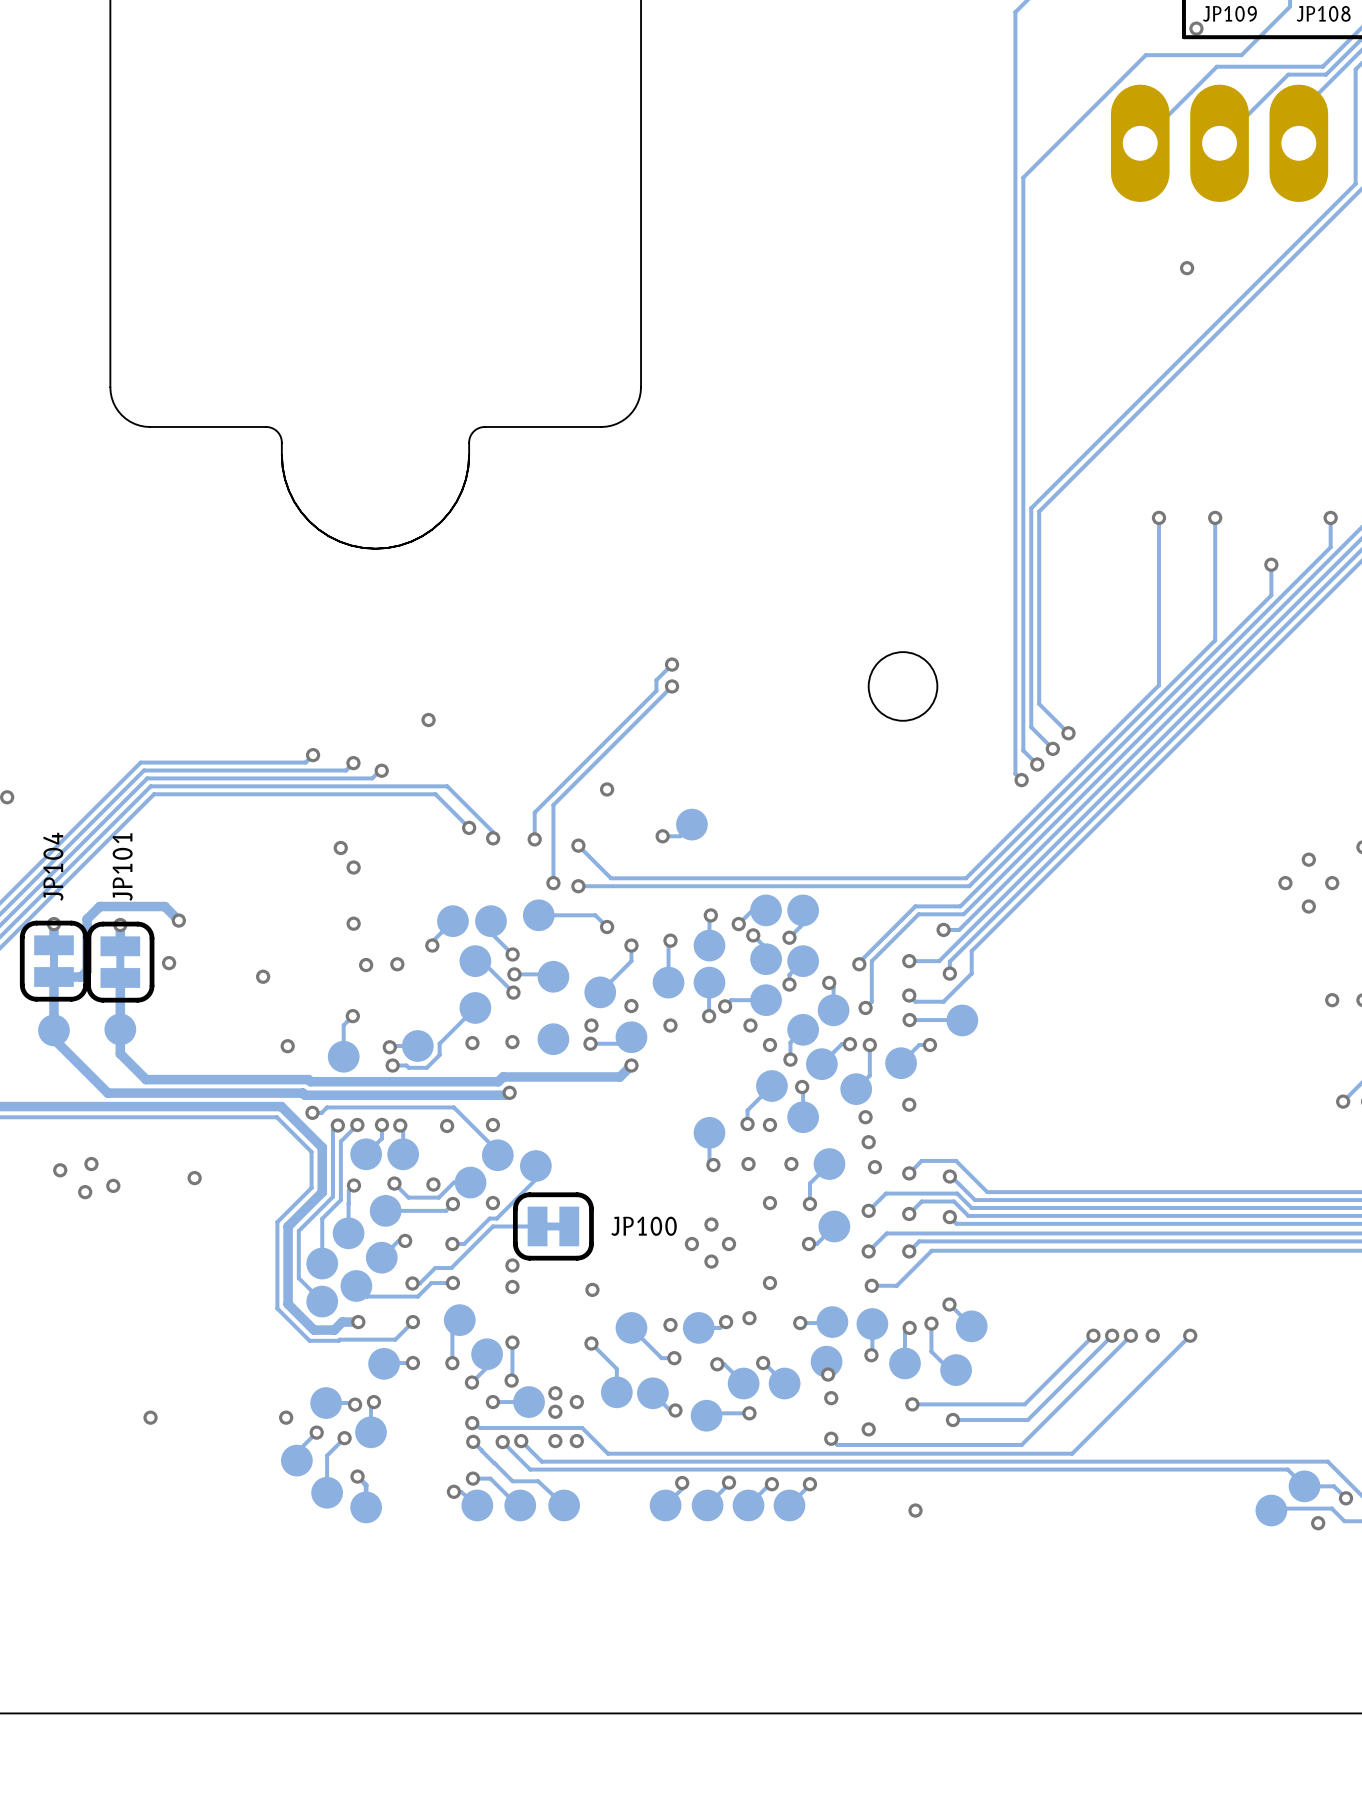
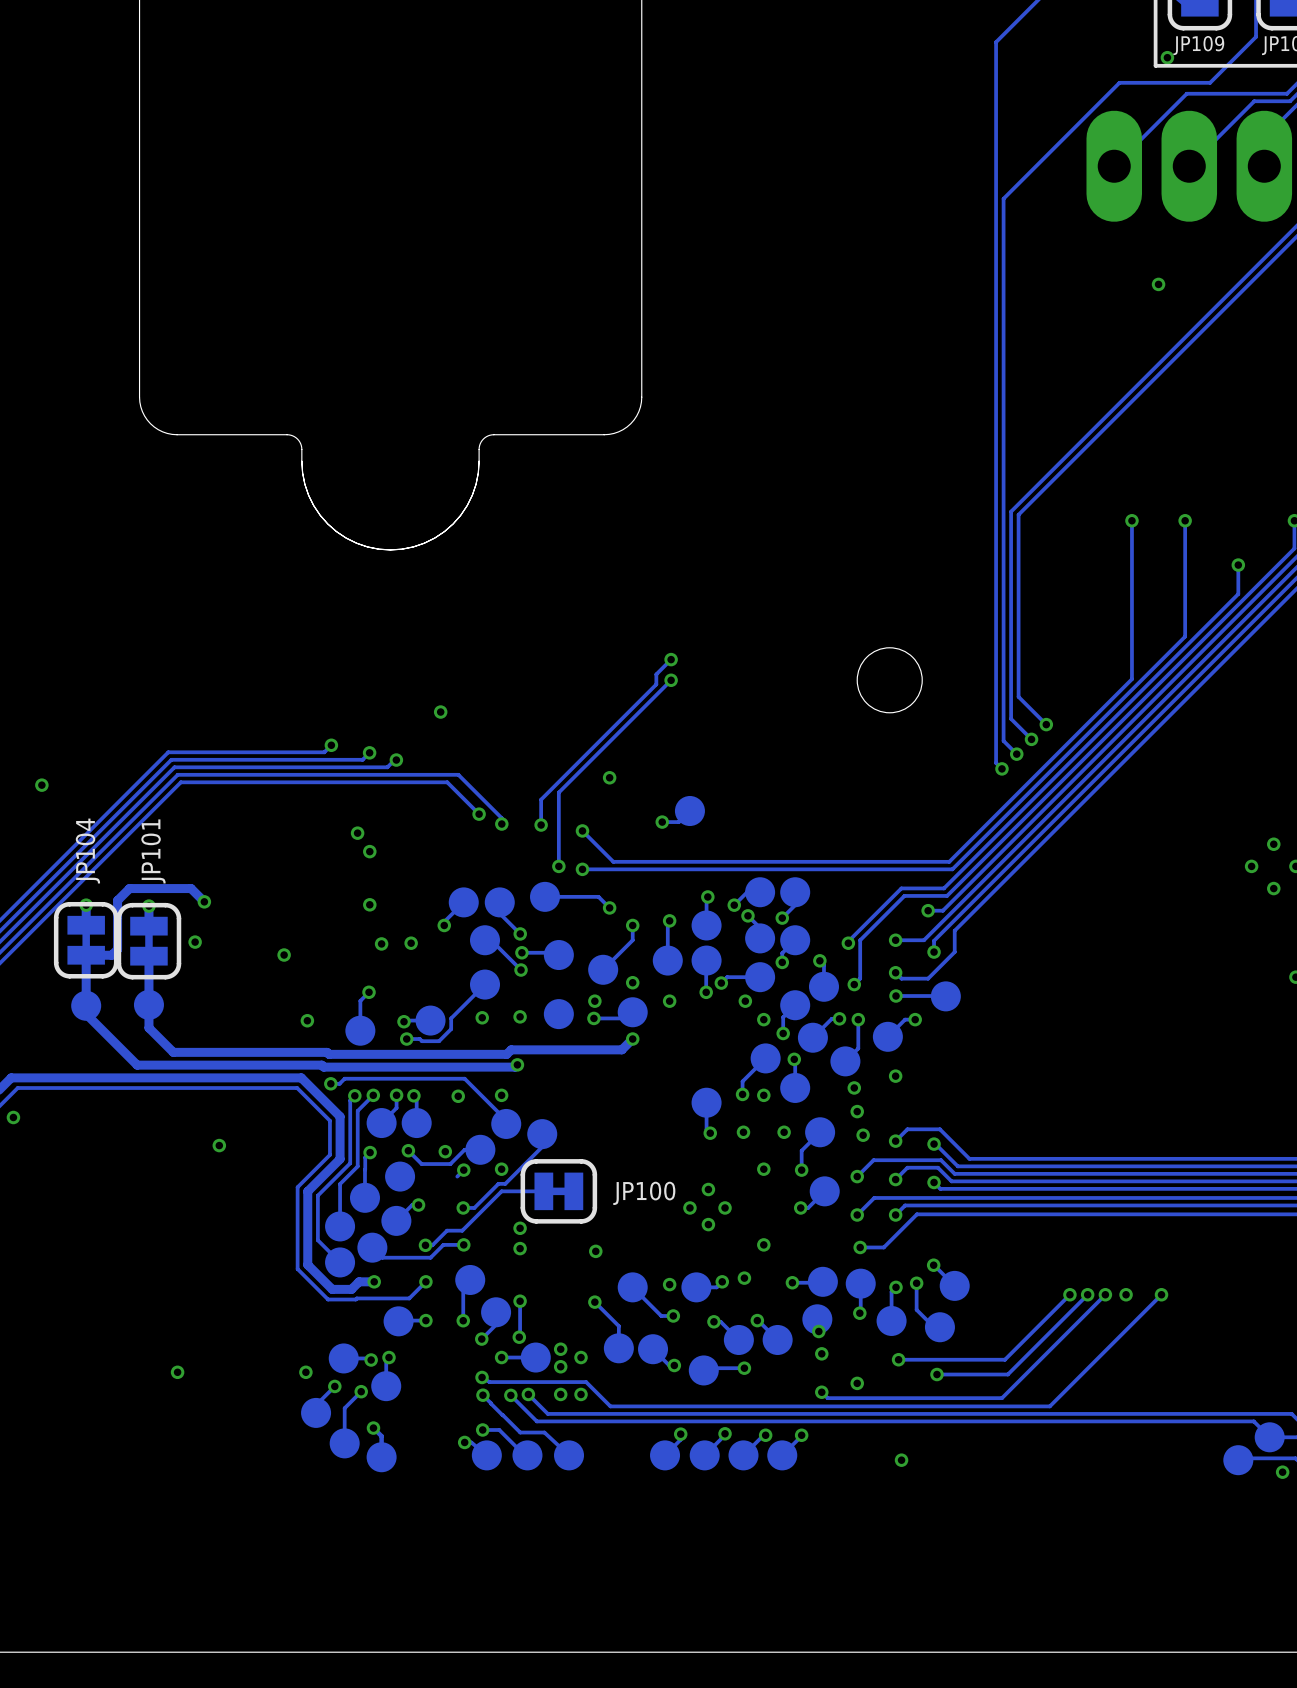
via: (91, 1164) -> none
via: (60, 1170) -> none
via: (113, 1185) -> none
via: (85, 1192) -> none
track: (446, 1210) (385, 1210) -> none

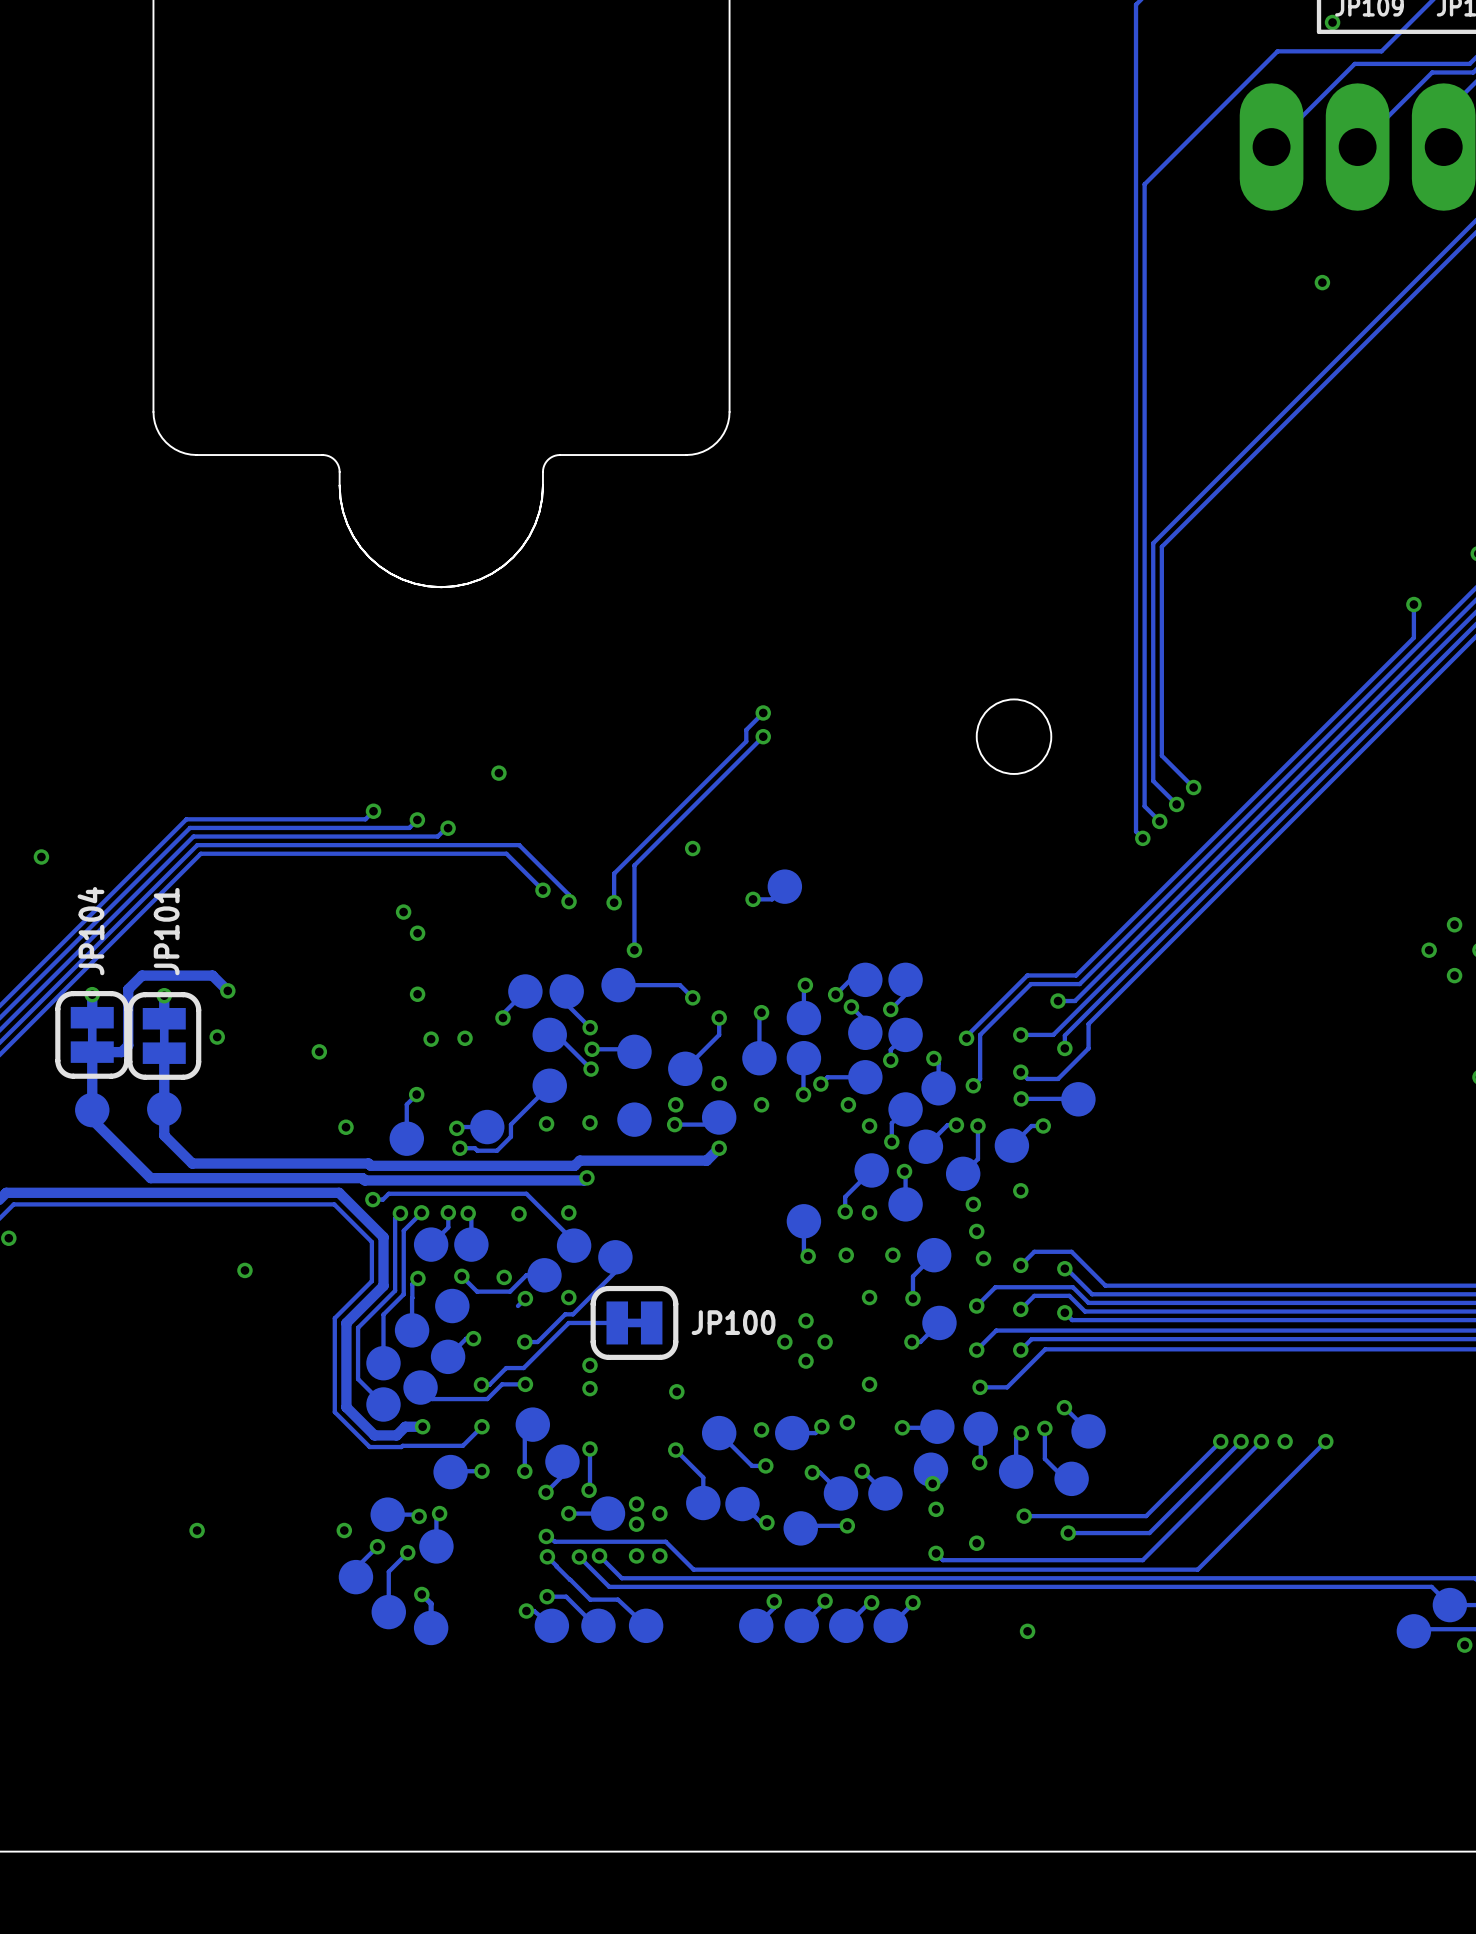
track: (1131, 520) (1131, 679) (949, 861) (613, 861) (582, 830) -> none
via: (1131, 520) -> none
track: (1185, 520) (1185, 636) (952, 869) (582, 869) -> none
via: (1185, 520) -> none
via: (582, 830) -> none
via: (582, 869) -> none

